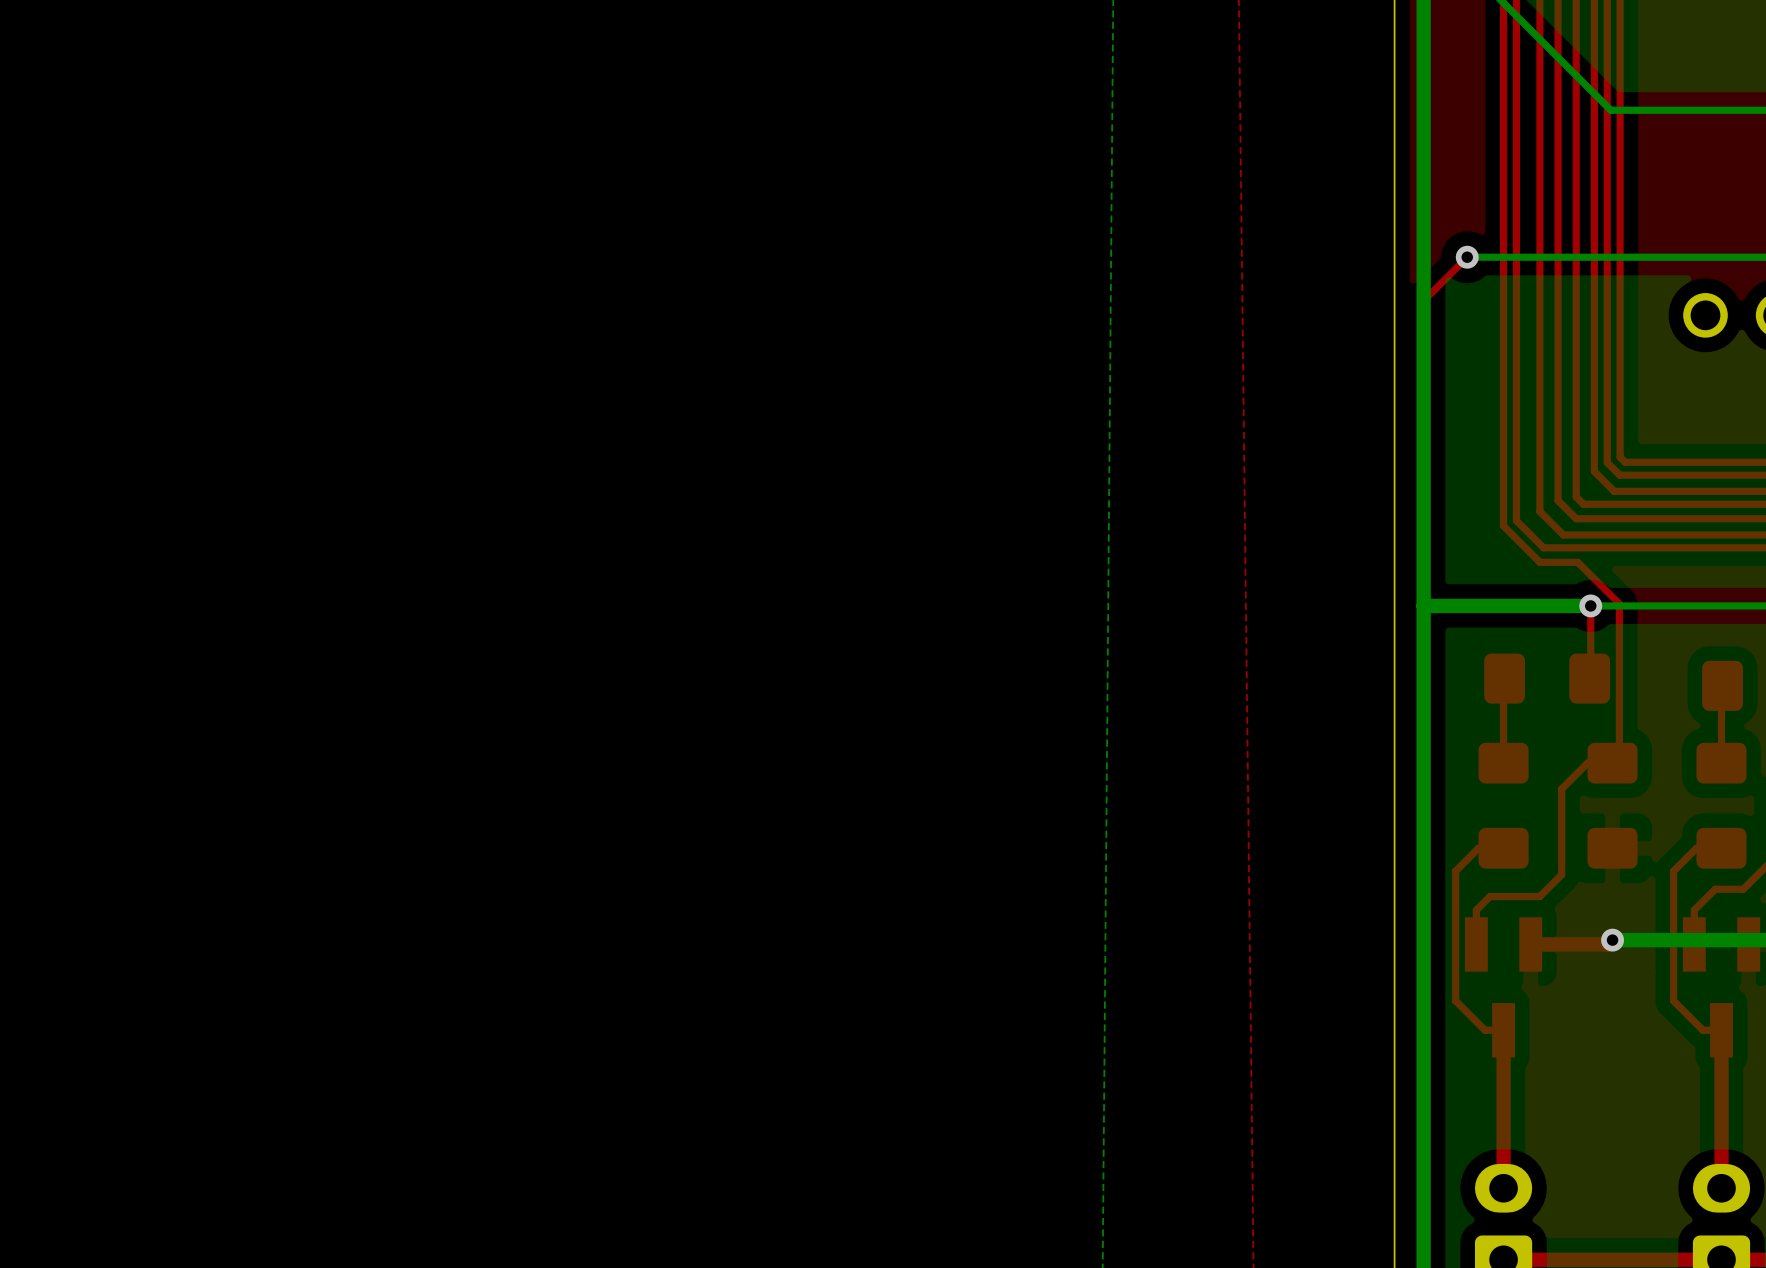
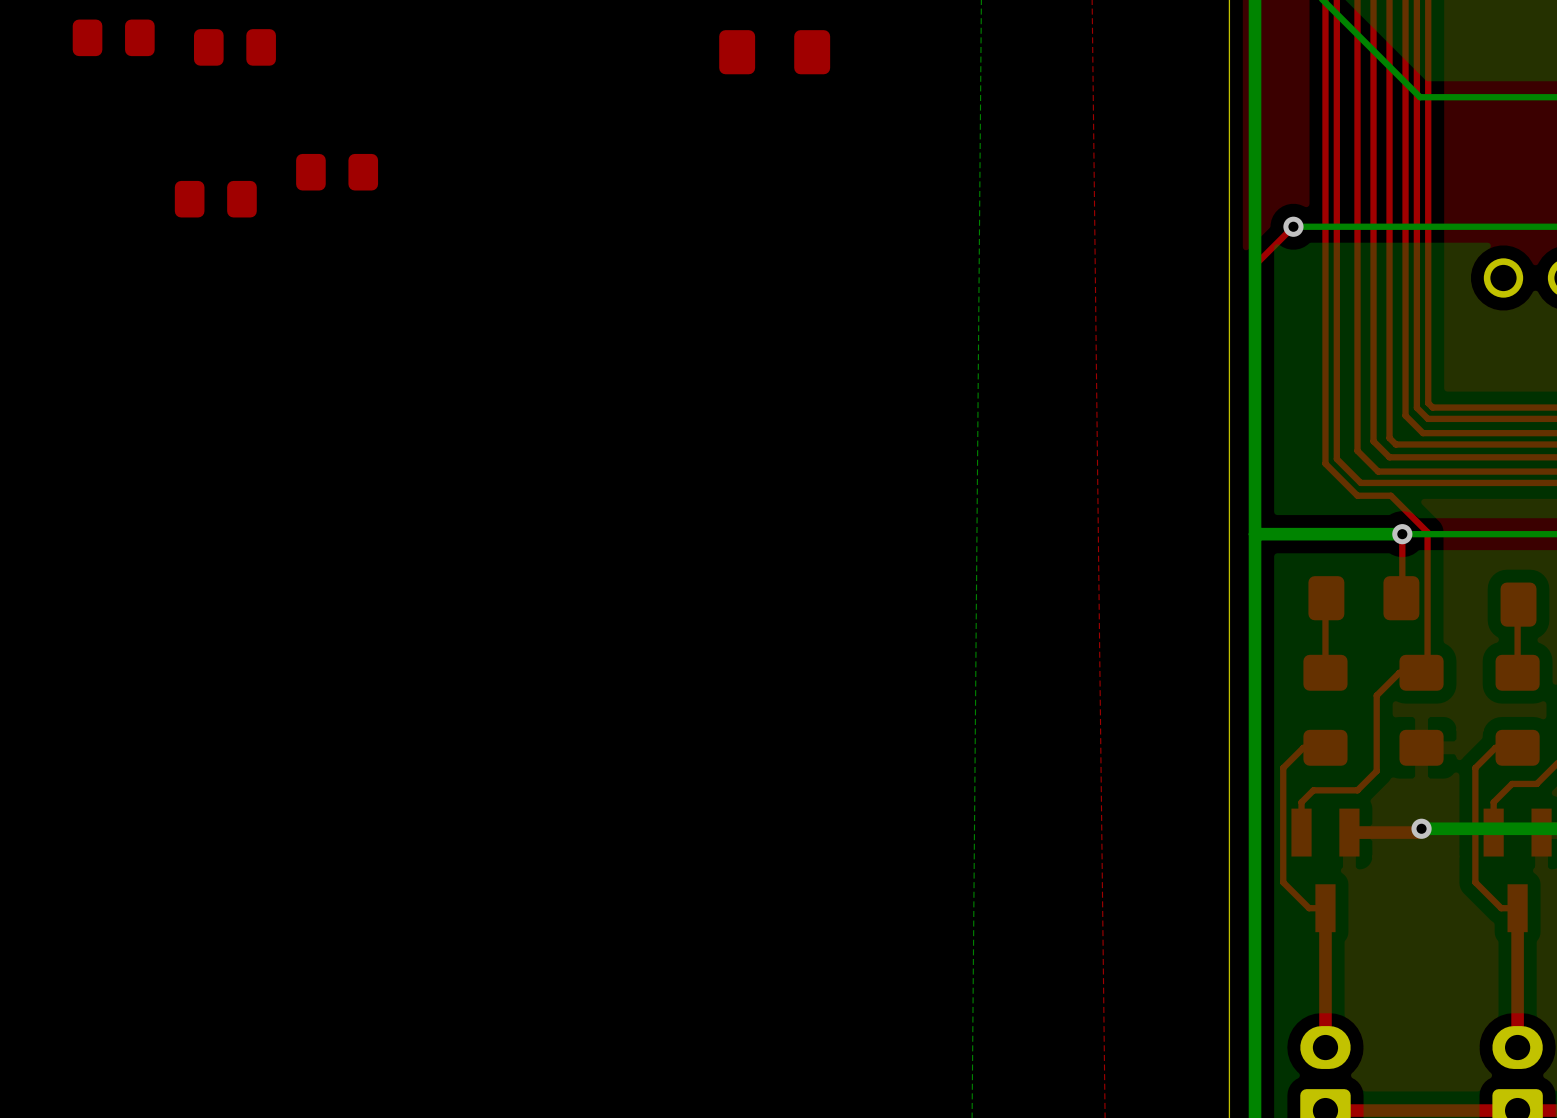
part: none -> (113, 37)
part: none -> (234, 47)
part: none -> (774, 52)
part: none -> (337, 172)
part: none -> (215, 199)

